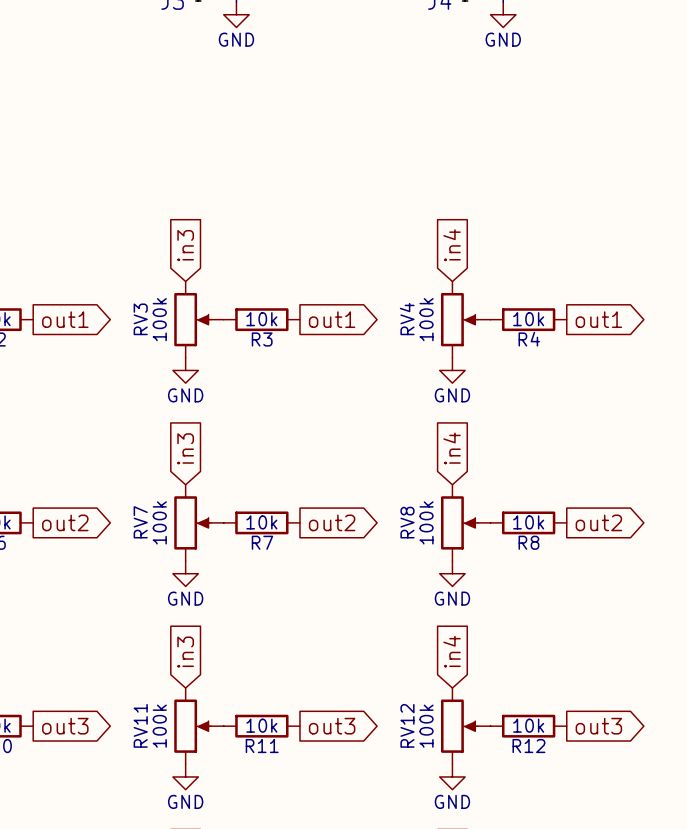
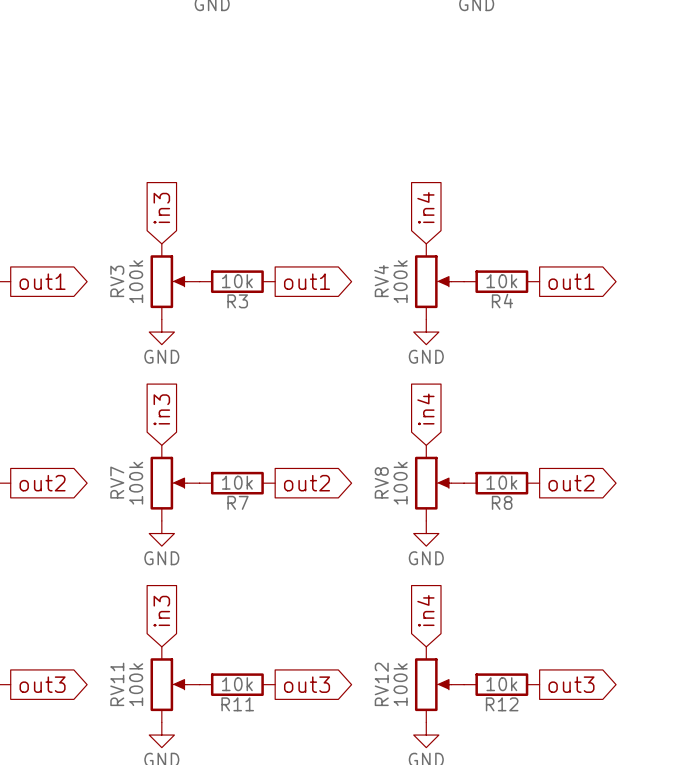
RV3 flip: as is (192, 319) -> up-down (168, 281)
RV4 flip: as is (459, 319) -> up-down (433, 281)
RV7 flip: as is (192, 522) -> up-down (168, 483)
RV8 flip: as is (459, 522) -> up-down (433, 483)
RV11 flip: as is (192, 726) -> up-down (168, 684)
RV12 flip: as is (459, 726) -> up-down (433, 684)

